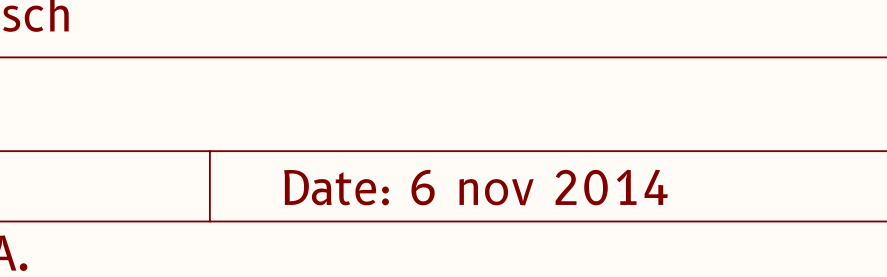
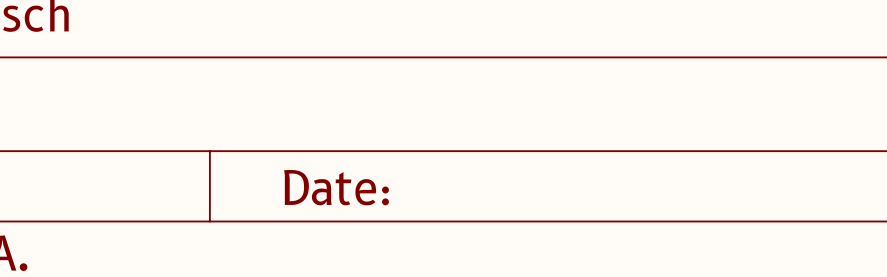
title block: Date: 6 nov 2014 (475, 187) -> Date: (336, 187)

